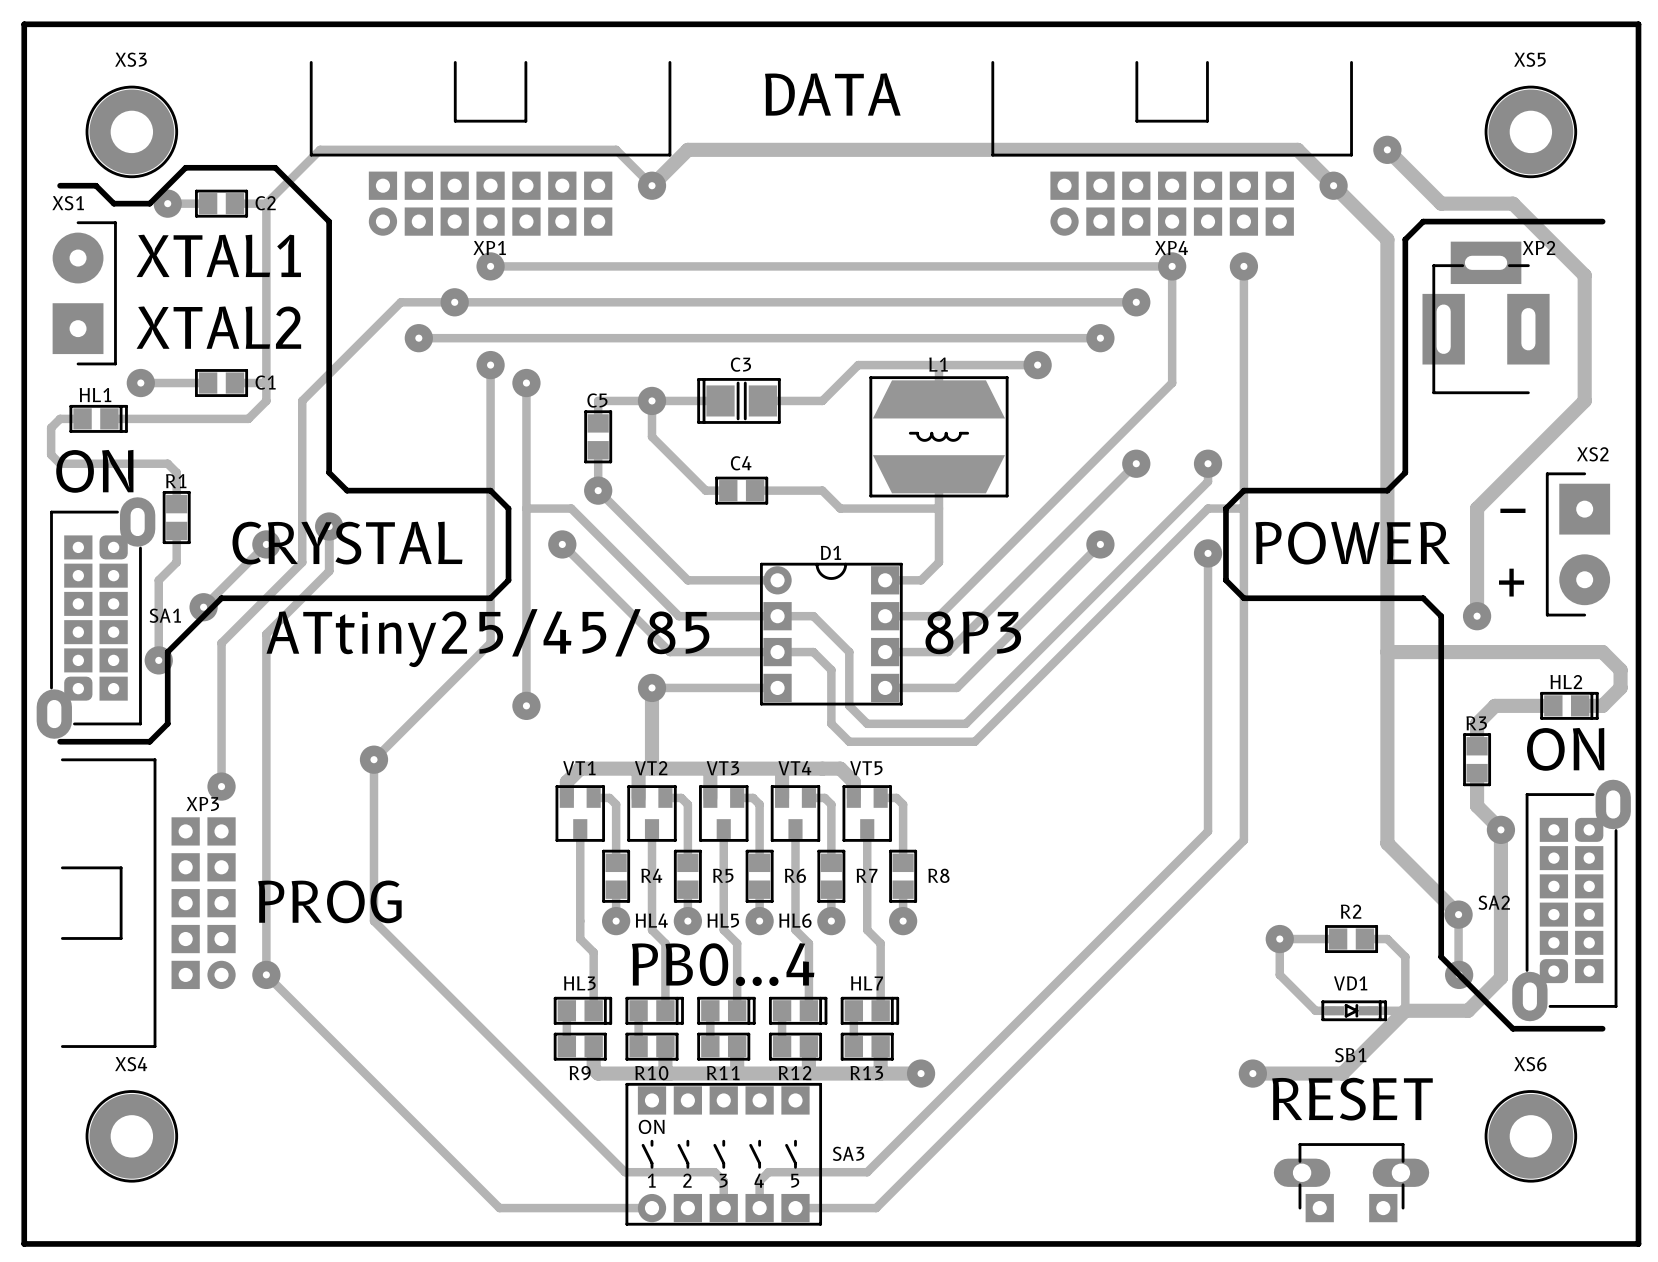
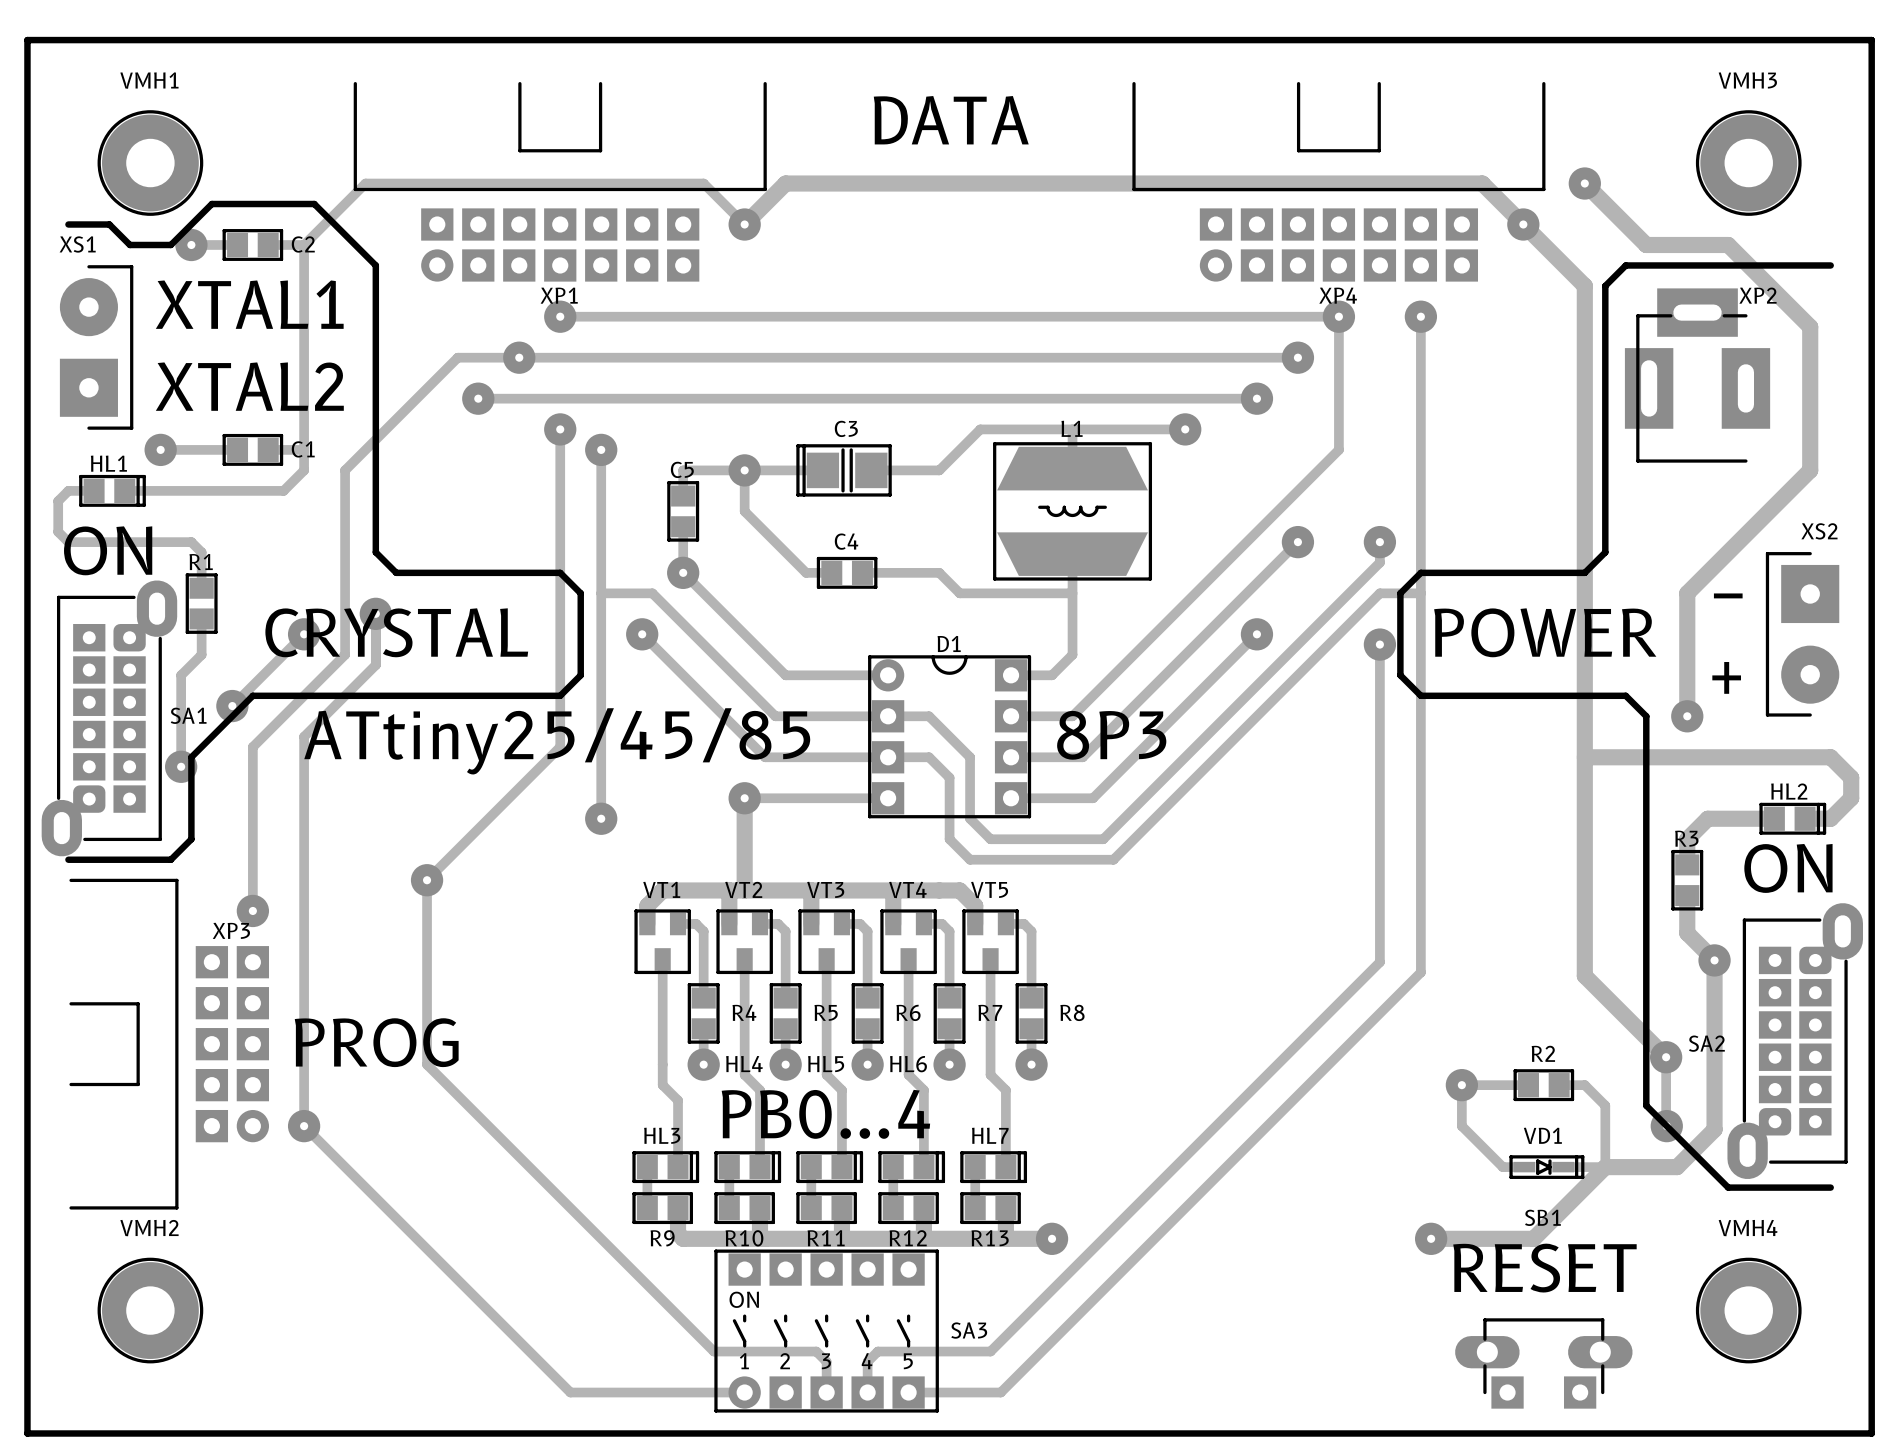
XS3 name: XS3 (130, 59) -> VMH1 (149, 80)
XS5 name: XS5 (1529, 59) -> VMH3 (1747, 80)
XS4 name: XS4 (131, 1064) -> VMH2 (149, 1228)
XS6 name: XS6 (1530, 1064) -> VMH4 (1748, 1228)

